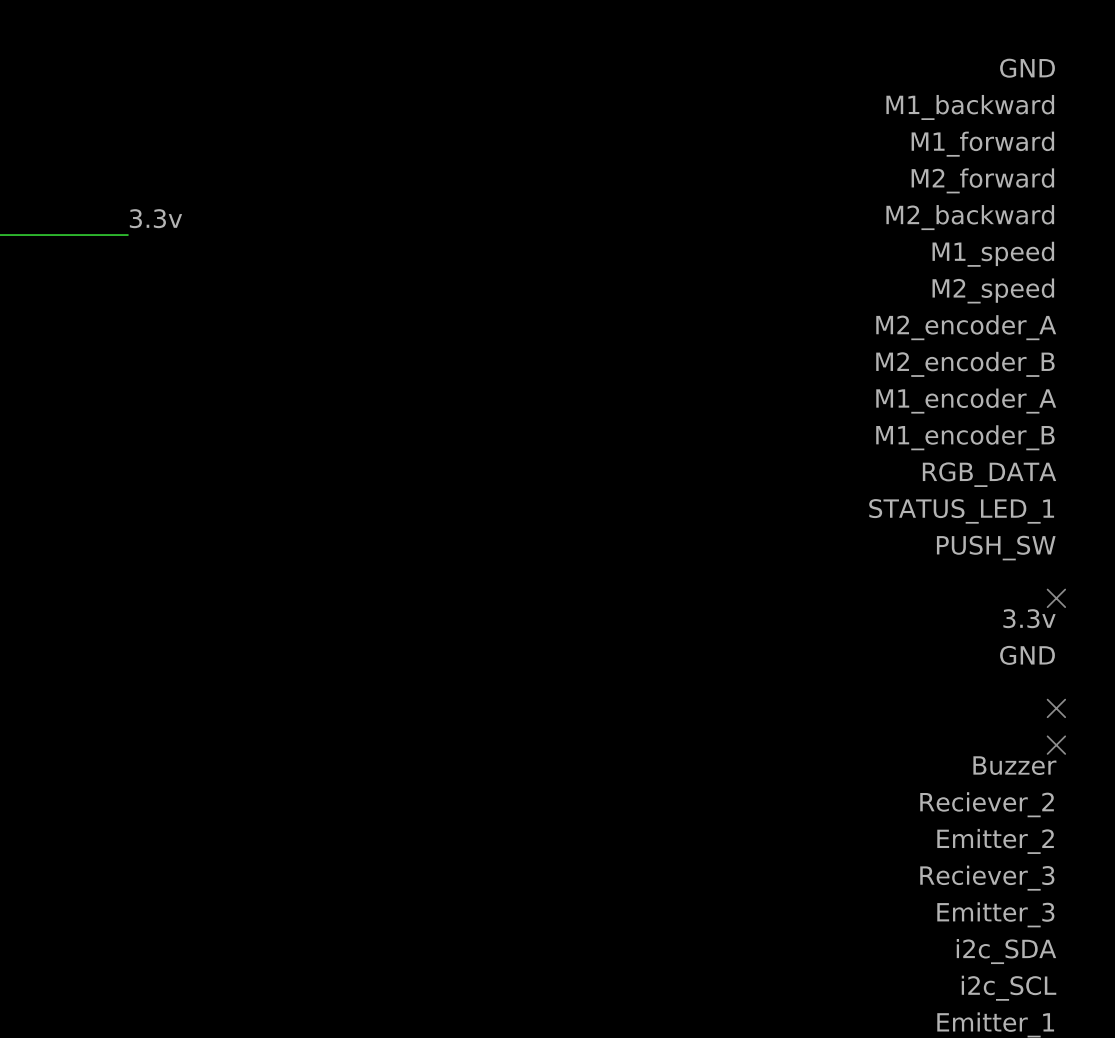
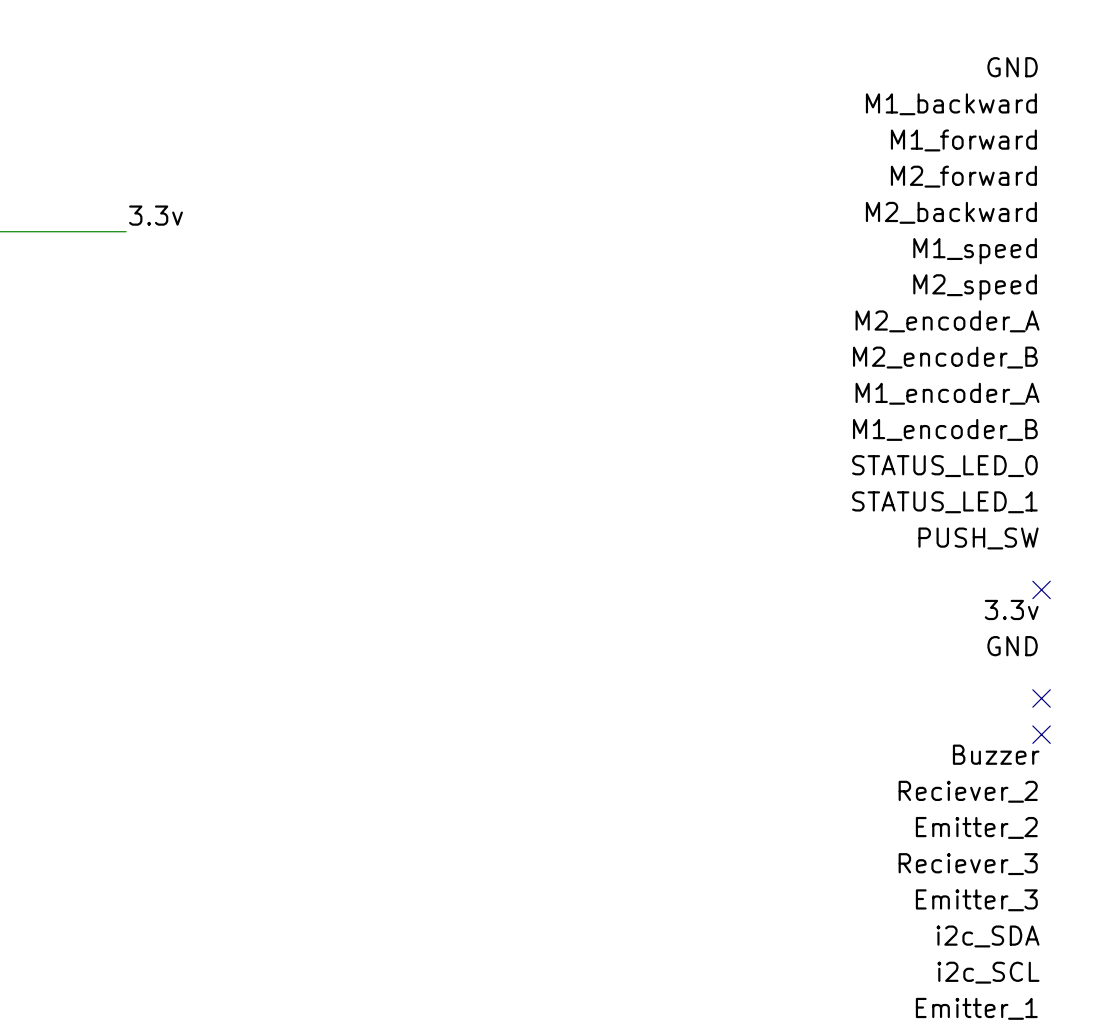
label: RGB_DATA (989, 474) -> STATUS_LED_0 (944, 466)

